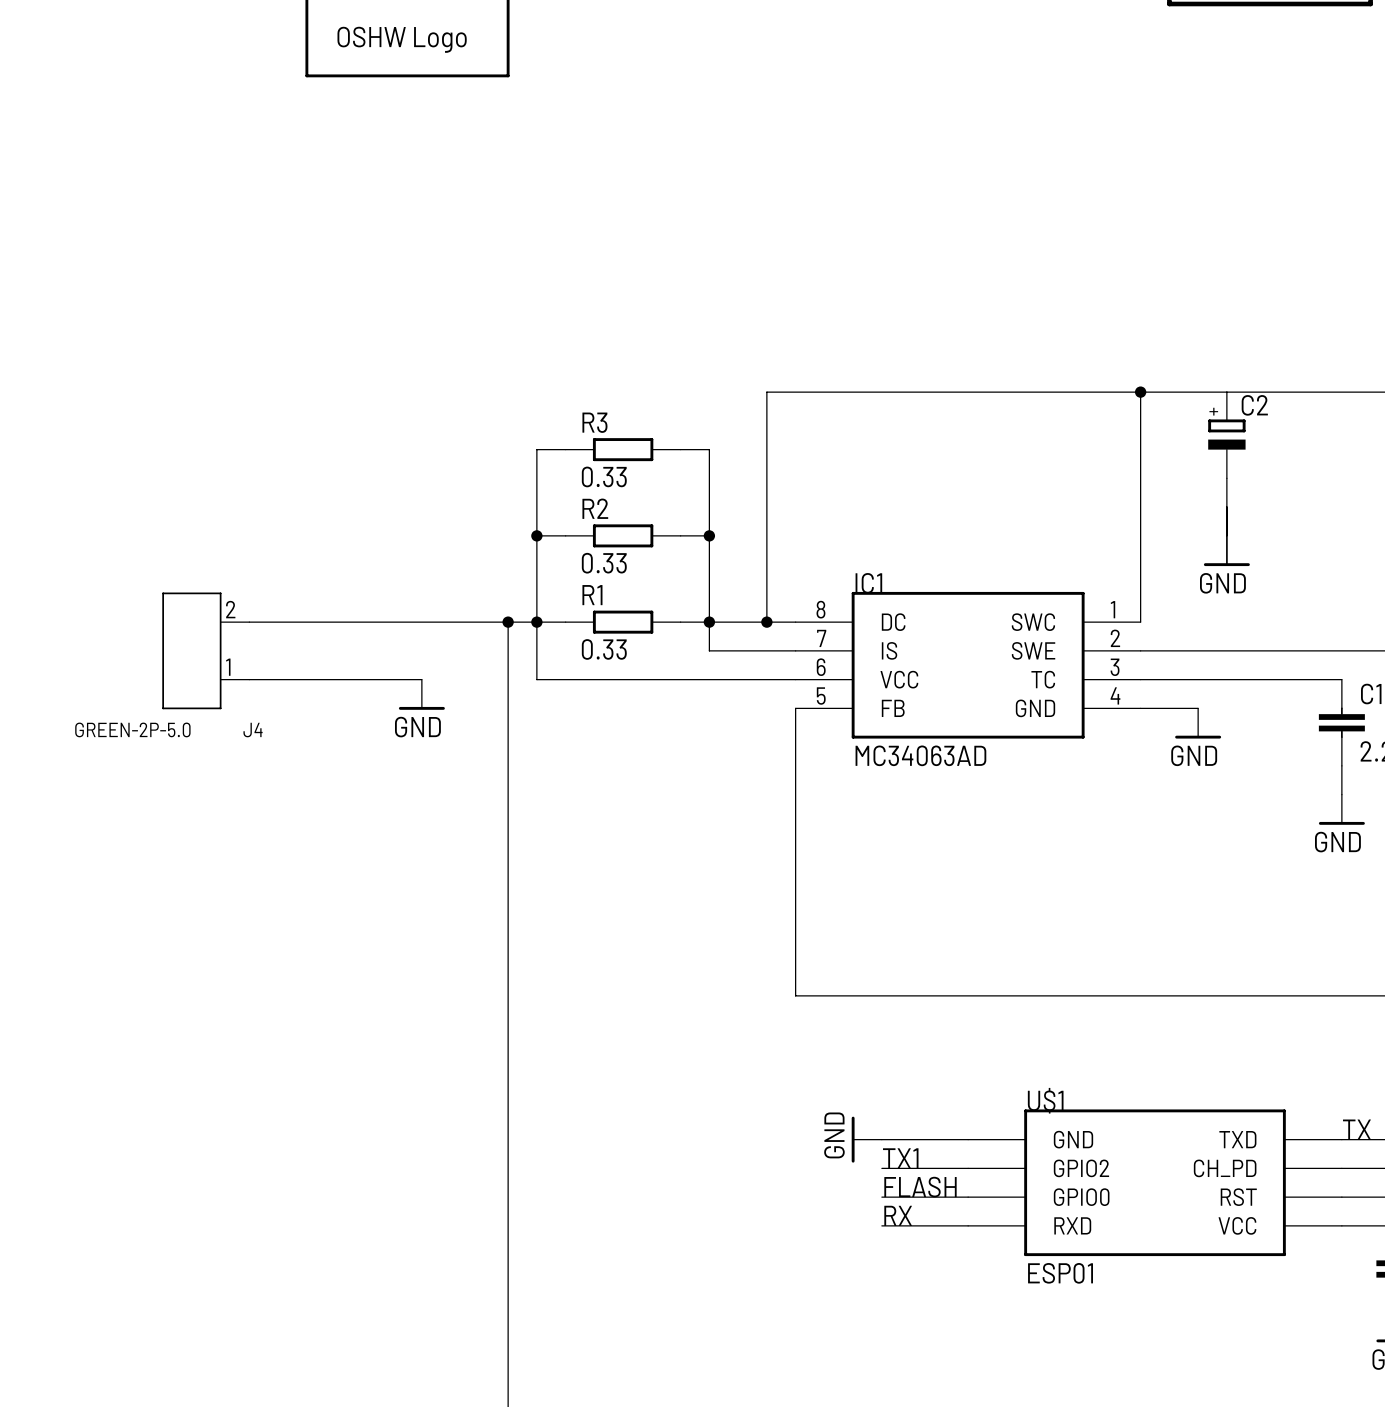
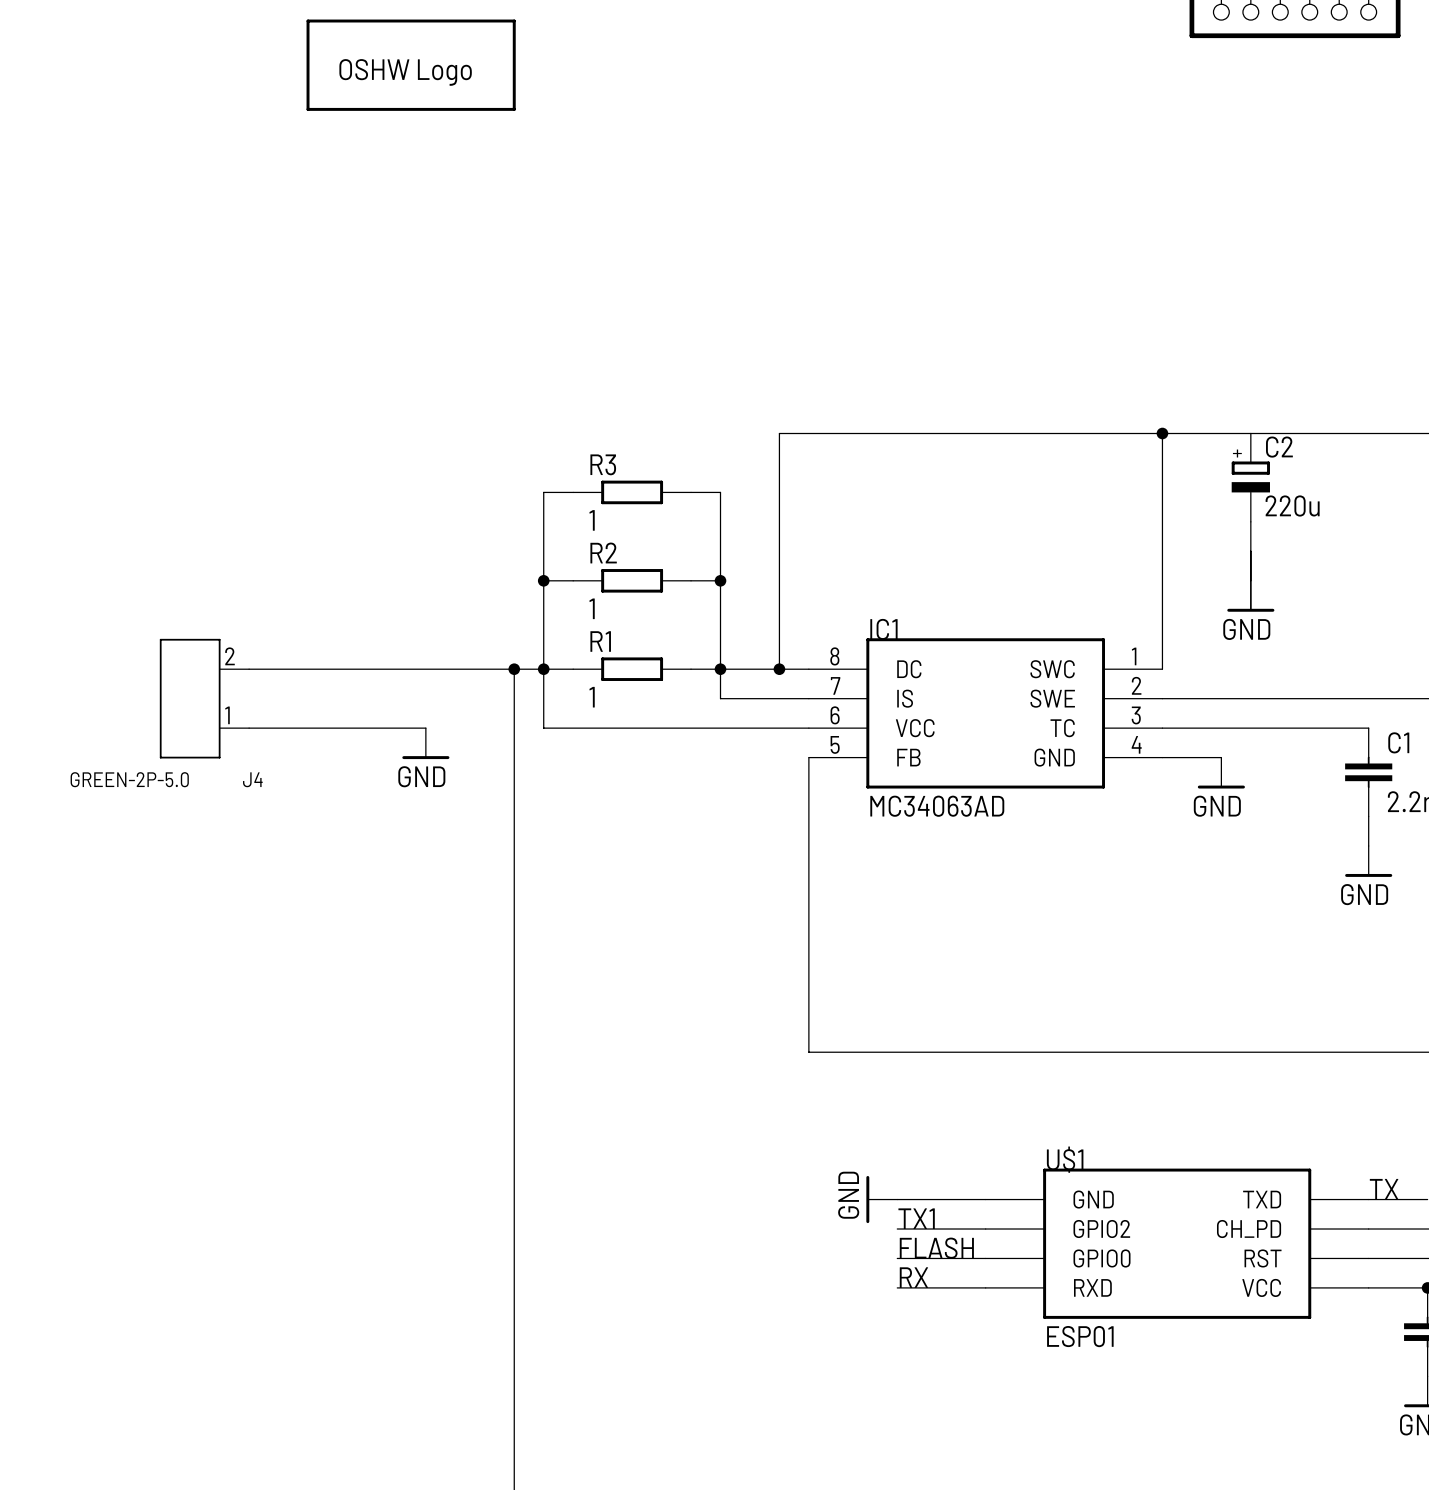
C2 value: none -> 220u (1292, 505)
R3 value: 0.33 (604, 476) -> 1 (592, 520)
R2 value: 0.33 (604, 563) -> 1 (592, 608)
R1 value: 0.33 (604, 649) -> 1 (592, 697)

